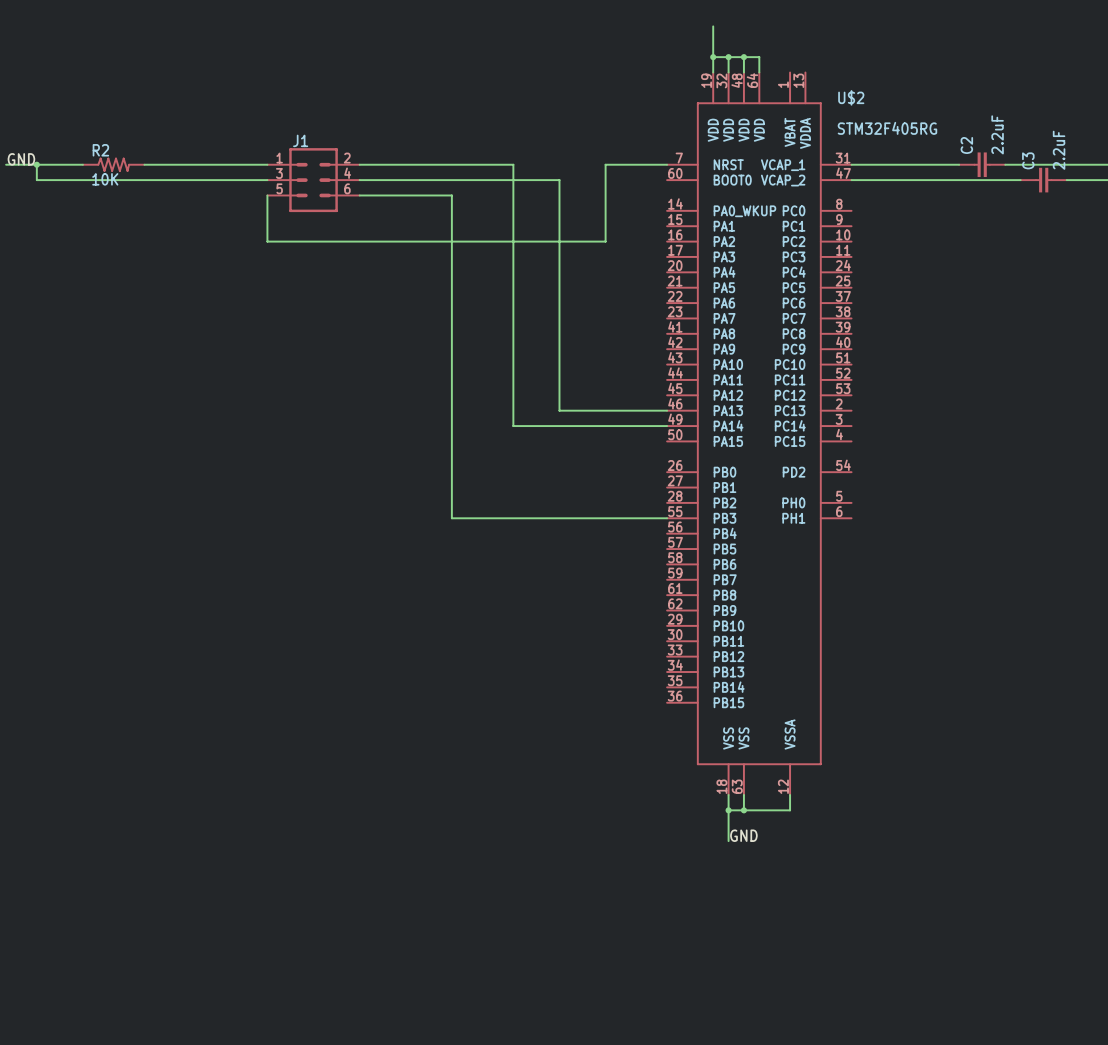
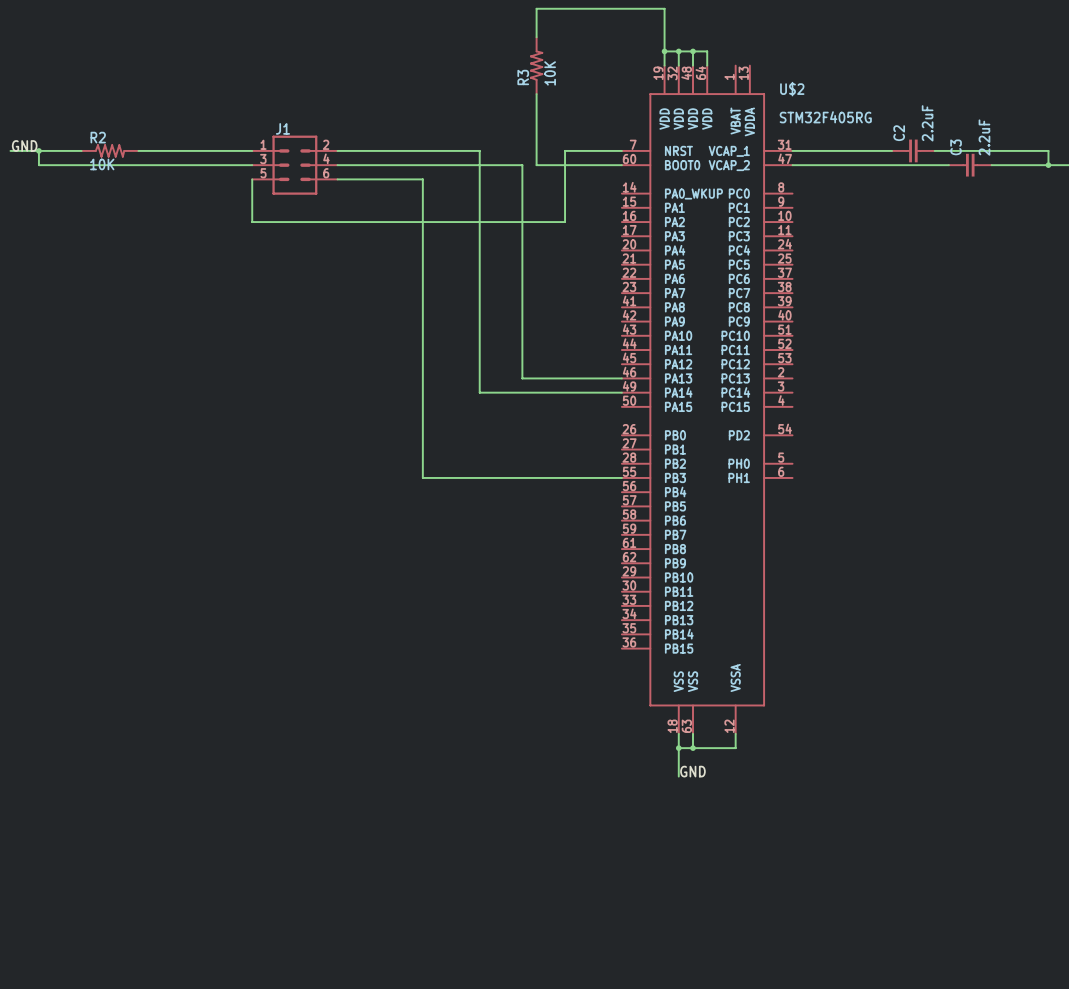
wire: none -> (664, 22) (664, 8) (536, 8) (536, 37)
R3: none -> 10K (536, 65)
wire: none -> (536, 94) (536, 165) (621, 165)

